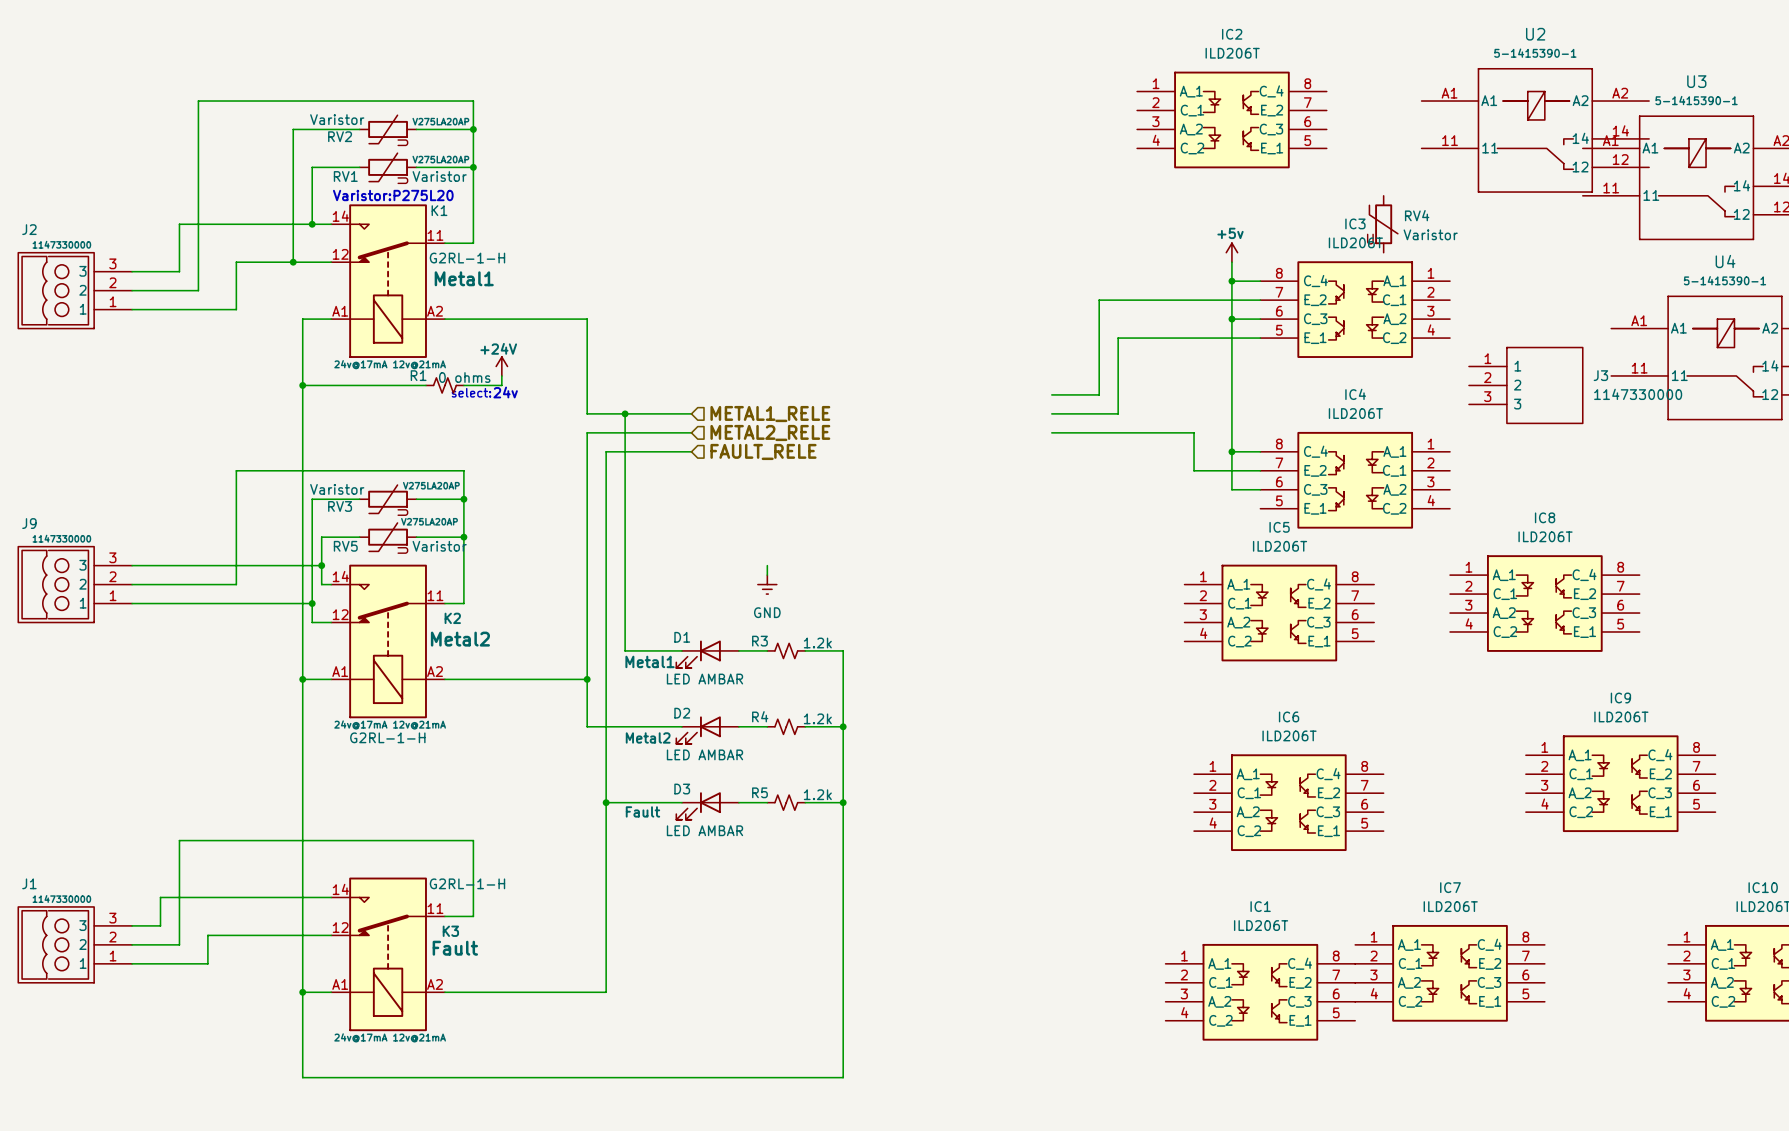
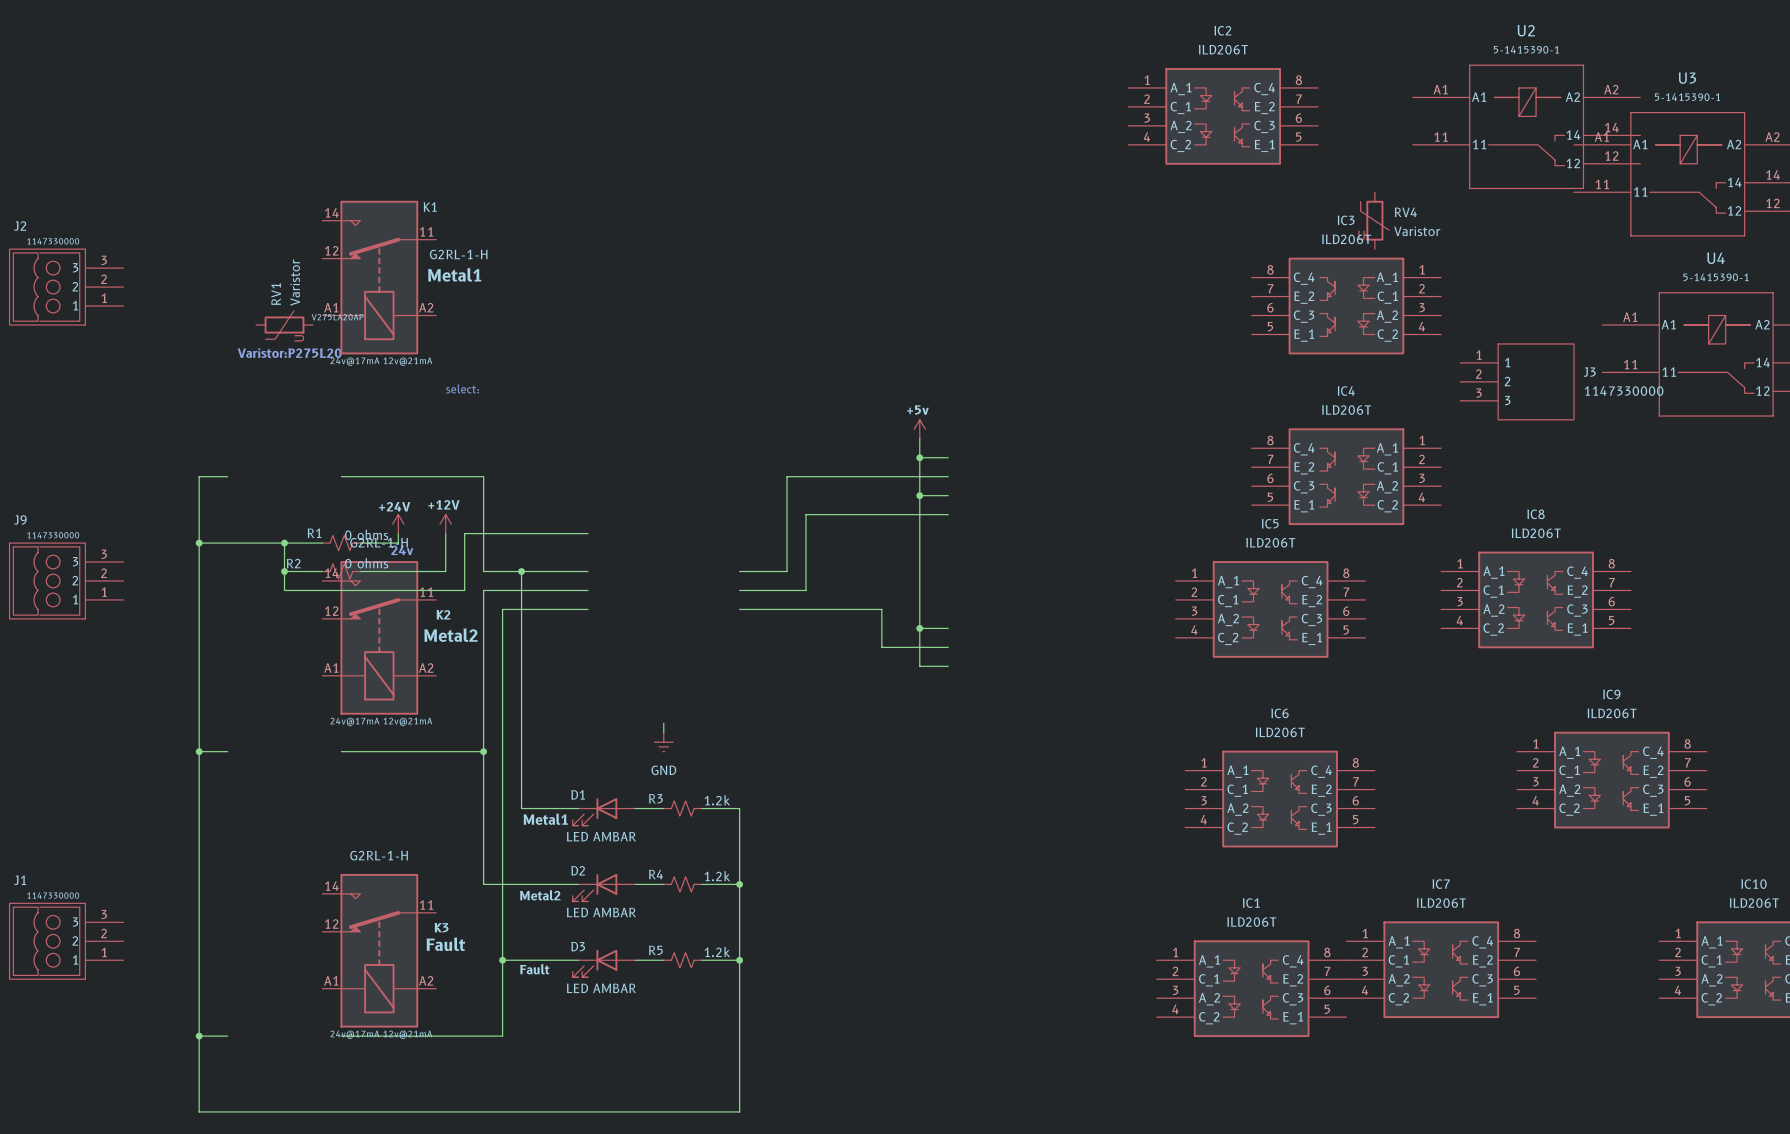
wire: (359, 129) (293, 129) (293, 262) -> none
RV2: Varistor (388, 129) -> none
wire: (416, 129) (473, 129) -> none
junction: (473, 129) -> none
wire: (359, 167) (312, 167) (312, 224) -> none
RV1 position: (388, 167) -> (284, 324)
wire: (416, 167) (473, 167) -> none
junction: (473, 167) -> none
RV1 name rotation: 0° (345, 176) -> 90° counterclockwise (276, 294)
RV1 name position: RV1 (345, 176) -> RV1 (276, 294)
RV1 value rotation: 0° (439, 176) -> 90° counterclockwise (295, 282)
text: Varistor:P275L20 (393, 195) -> none
junction: (312, 224) -> none
wire: (331, 224) (179, 224) (179, 271) (132, 271) -> none
wire: (444, 243) (473, 243) (473, 101) (198, 101) (198, 290) (132, 290) -> none
power symbol: +5v (1231, 252) -> none
junction: (293, 262) -> none
wire: (331, 262) (236, 262) (236, 309) (132, 309) -> none
wire: (1231, 262) (1231, 489) (1260, 489) -> none
wire: (1231, 281) (1260, 281) -> none
junction: (1231, 281) -> none
wire: (1260, 300) (1099, 300) (1099, 394) (1051, 394) -> none
wire: (331, 319) (302, 319) (302, 1077) (843, 1077) (843, 650) (805, 650) -> none
wire: (444, 319) (587, 319) (587, 413) (691, 413) -> none
wire: (1231, 319) (1260, 319) -> none
junction: (1231, 319) -> none
wire: (1260, 338) (1118, 338) (1118, 413) (1051, 413) -> none
text: none -> Varistor:P275L20 (289, 353)
power symbol: +24V (501, 366) -> none
wire: (501, 375) (501, 385) (463, 385) -> none
wire: (302, 385) (425, 385) -> none
junction: (302, 385) -> none
R1 position: (444, 385) -> (341, 543)
text: 24v (505, 392) -> none
wire: (625, 413) (625, 650) (681, 650) -> none
junction: (625, 413) -> none
hierarchical label: METAL1_RELE (770, 414) -> none
wire: (691, 432) (587, 432) (587, 726) (681, 726) -> none
power symbol: none -> +5v (919, 429)
wire: (1051, 432) (1194, 432) (1194, 470) (1260, 470) -> none
hierarchical label: METAL2_RELE (770, 433) -> none
wire: none -> (919, 438) (919, 666) (948, 666)
wire: (691, 451) (606, 451) (606, 992) (444, 992) -> none
hierarchical label: FAULT_RELE (763, 451) -> none
wire: (1231, 451) (1260, 451) -> none
junction: (1231, 451) -> none
wire: none -> (919, 457) (948, 457)
junction: none -> (919, 457)
wire: none -> (341, 476) (483, 476) (483, 571) (587, 571)
wire: none -> (948, 476) (787, 476) (787, 571) (739, 571)
wire: (359, 499) (312, 499) (312, 622) (331, 622) -> none
RV3: Varistor (388, 499) -> none
wire: (416, 499) (463, 499) -> none
junction: (463, 499) -> none
wire: none -> (919, 495) (948, 495)
junction: none -> (919, 495)
wire: none -> (948, 514) (805, 514) (805, 590) (739, 590)
power symbol: none -> +24V (398, 524)
power symbol: none -> +12V (445, 524)
wire: (359, 537) (321, 537) (321, 584) (331, 584) -> none
RV5: Varistor (388, 537) -> none
wire: none -> (398, 533) (398, 543) (360, 543)
wire: (416, 537) (463, 537) -> none
wire: none -> (445, 533) (445, 571) (360, 571)
junction: (463, 537) -> none
wire: none -> (587, 533) (464, 533) (464, 590) (284, 590) (284, 543)
wire: none -> (199, 543) (322, 543)
junction: none -> (199, 543)
junction: none -> (284, 543)
text: none -> 24v (402, 550)
wire: (132, 565) (321, 565) -> none
junction: (321, 565) -> none
wire: (767, 565) (767, 575) -> none
wire: none -> (284, 571) (322, 571)
junction: none -> (284, 571)
R2: none -> 0 ohms (341, 571)
wire: none -> (521, 571) (521, 808) (578, 808)
junction: none -> (521, 571)
wire: (132, 584) (236, 584) (236, 470) (463, 470) (463, 603) (444, 603) -> none
power symbol: GND (767, 584) -> none
wire: none -> (587, 590) (483, 590) (483, 884) (578, 884)
wire: (132, 603) (312, 603) -> none
junction: (312, 603) -> none
wire: none -> (587, 609) (502, 609) (502, 1036) (341, 1036)
wire: none -> (739, 609) (881, 609) (881, 647) (948, 647)
wire: none -> (919, 628) (948, 628)
junction: none -> (919, 628)
wire: (738, 650) (767, 650) -> none
R3 position: (786, 650) -> (682, 808)
D1 position: (707, 654) -> (604, 811)
wire: (302, 679) (331, 679) -> (199, 751) (227, 751)
junction: (302, 679) -> none
wire: (444, 679) (587, 679) -> (341, 751) (483, 751)
junction: (587, 679) -> none
wire: none -> (663, 723) (663, 732)
wire: (738, 726) (767, 726) -> (635, 808) (663, 808)
R4 position: (786, 726) -> (682, 884)
wire: (805, 726) (843, 726) -> none
junction: (843, 726) -> none
D2 position: (707, 730) -> (604, 887)
K2 value position: G2RL-1-H (387, 737) -> G2RL-1-H (379, 542)
power symbol: none -> GND (663, 742)
junction: none -> (199, 751)
junction: none -> (483, 751)
wire: (606, 802) (681, 802) -> none
junction: (606, 802) -> none
wire: (738, 802) (767, 802) -> (635, 884) (663, 884)
R5 position: (786, 802) -> (682, 960)
wire: (805, 802) (843, 802) -> (701, 884) (739, 884)
junction: (843, 802) -> none
D3 position: (707, 805) -> (604, 963)
K3 value position: G2RL-1-H (467, 883) -> G2RL-1-H (379, 855)
junction: none -> (739, 884)
wire: (331, 897) (160, 897) (160, 925) (132, 925) -> none
wire: (444, 916) (473, 916) (473, 840) (179, 840) (179, 944) (132, 944) -> none
wire: (207, 935) (331, 935) -> (199, 931) (199, 476) (227, 476)
wire: (132, 963) (207, 963) -> (701, 808) (739, 808) (739, 1111) (199, 1111) (199, 960)
wire: none -> (502, 960) (578, 960)
junction: none -> (502, 960)
wire: none -> (635, 960) (663, 960)
wire: none -> (701, 960) (739, 960)
junction: none -> (739, 960)
wire: (302, 992) (331, 992) -> (199, 1036) (227, 1036)
junction: (302, 992) -> none
junction: none -> (199, 1036)

